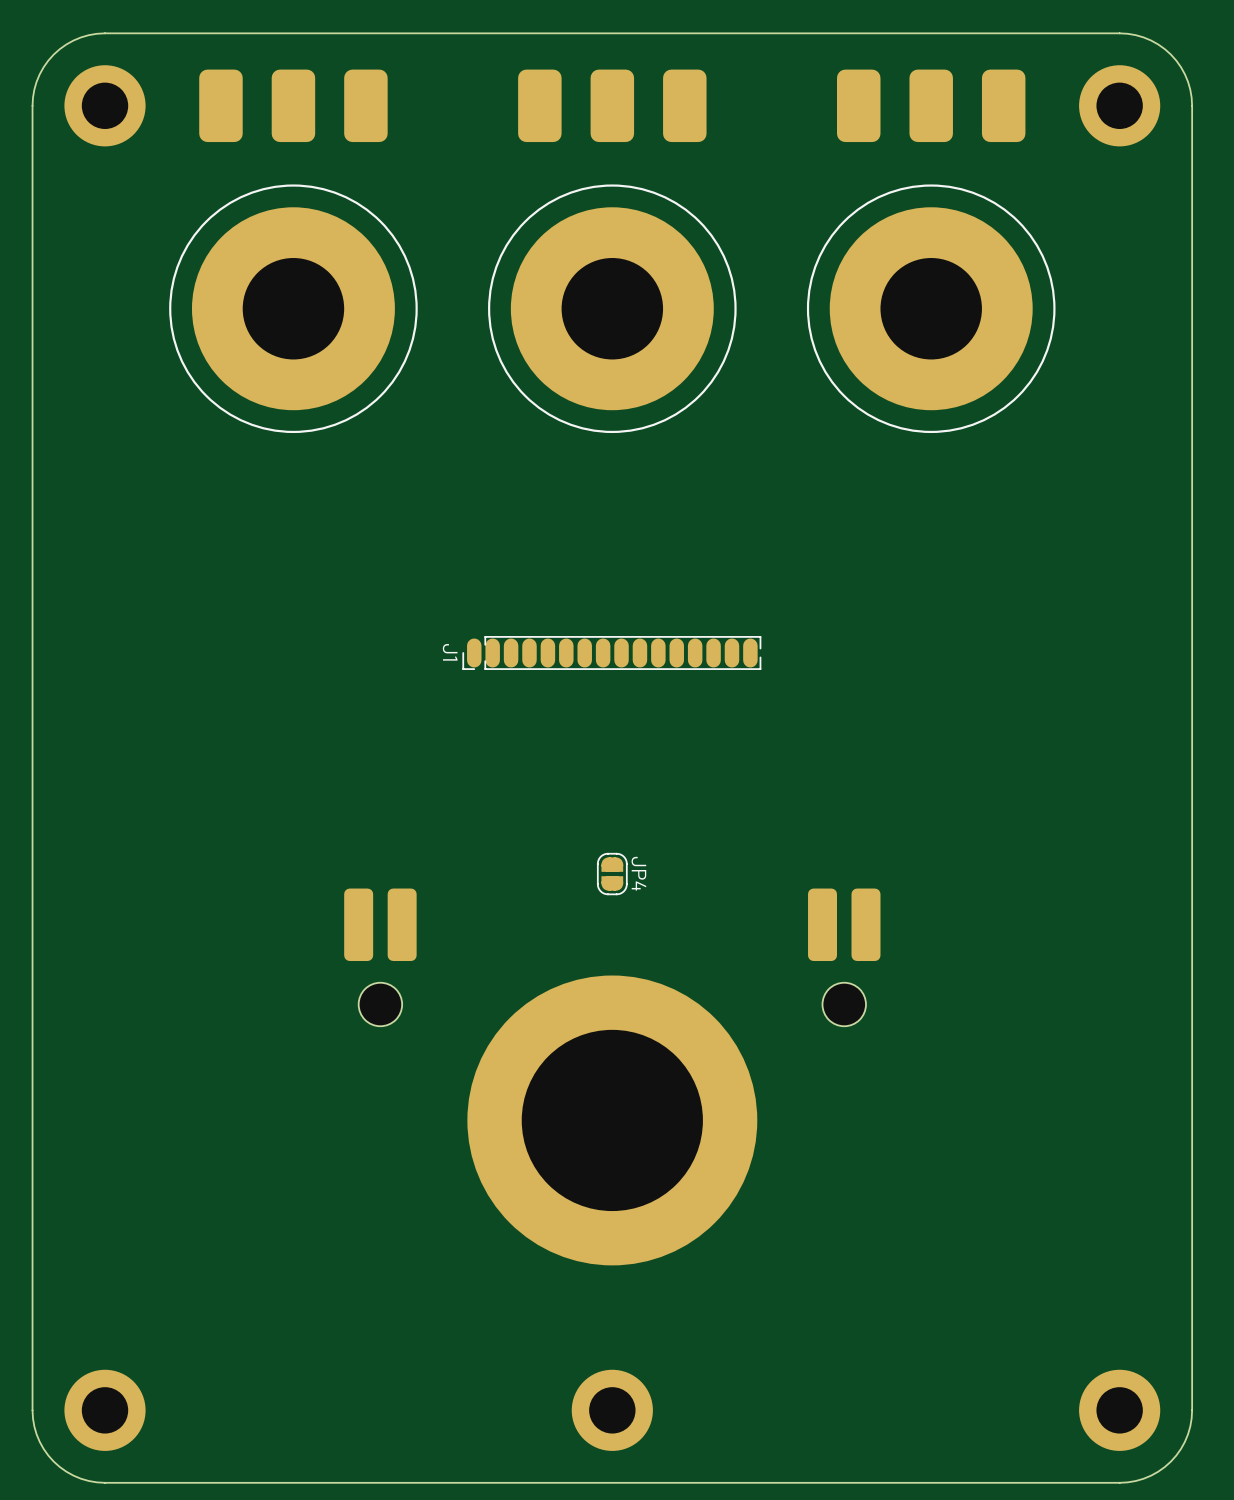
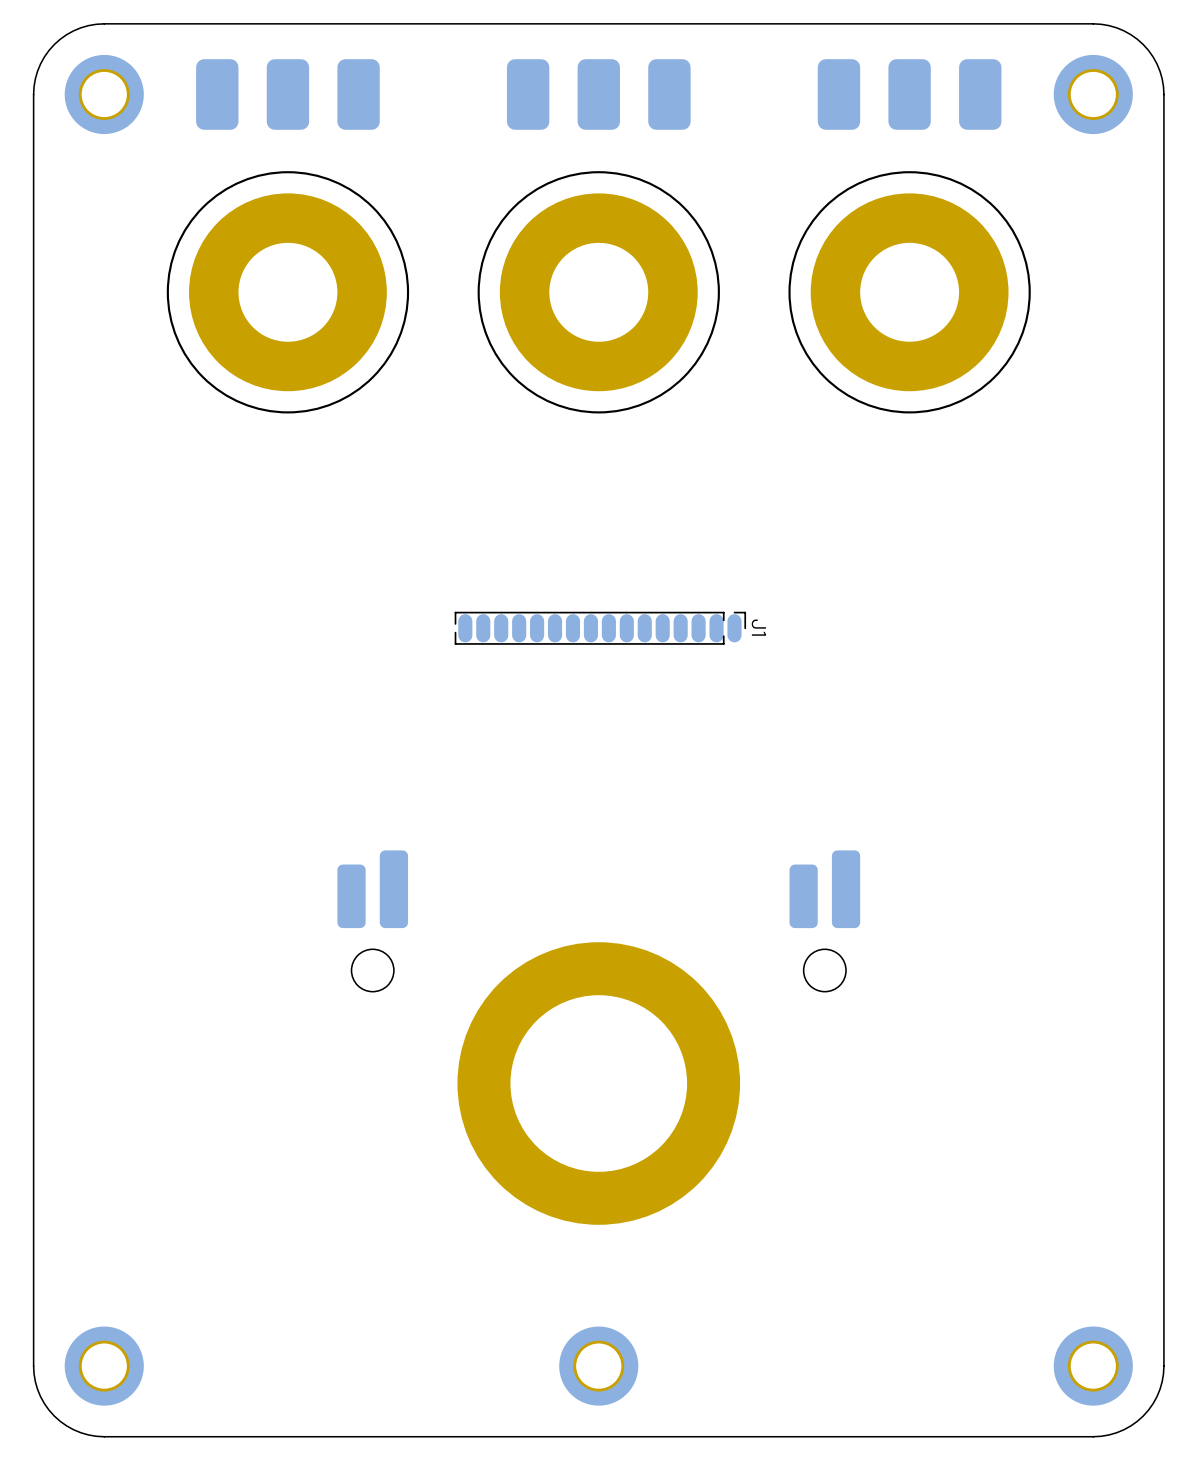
J1 rotation: 0° (611, 652) -> 180° (600, 628)
JP4: (612, 874) -> none
part footprint: [344, 888, 417, 1027] -> [337, 850, 409, 992]
part footprint: [808, 888, 881, 1027] -> [789, 850, 861, 992]

